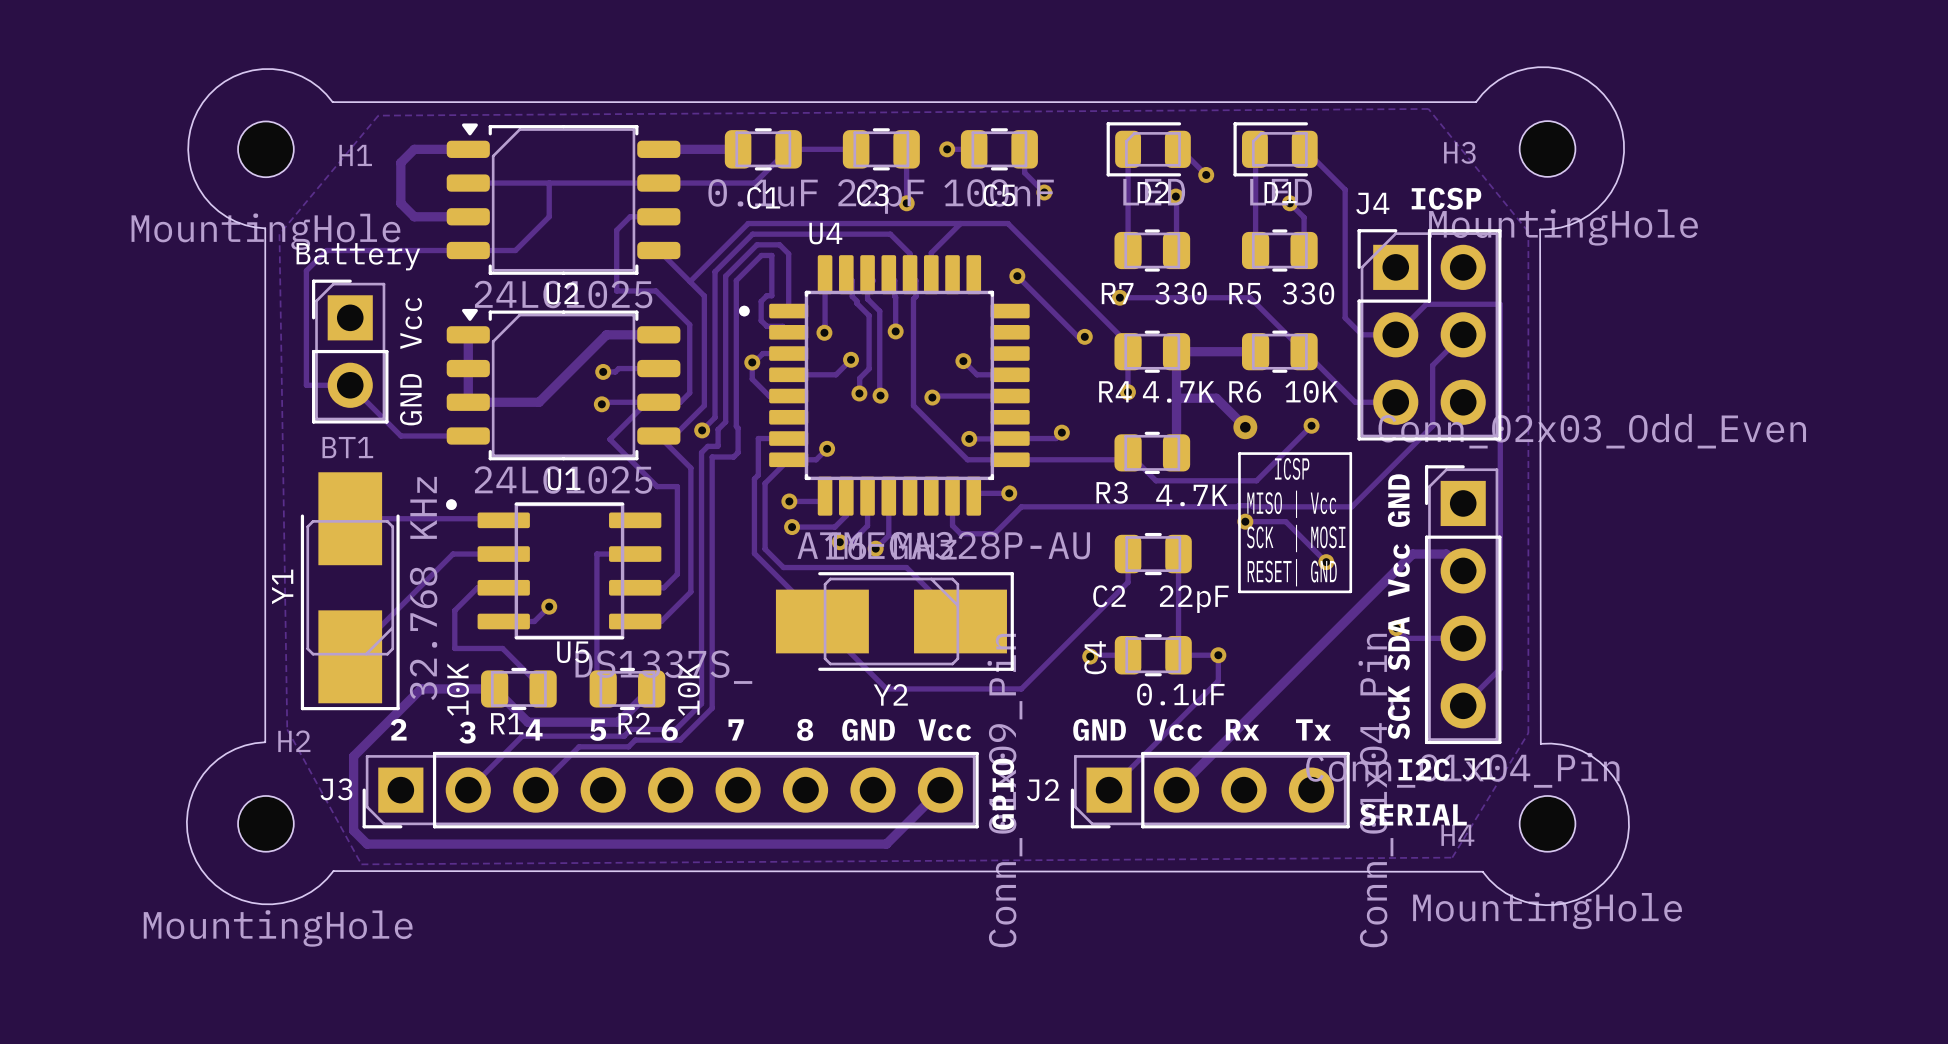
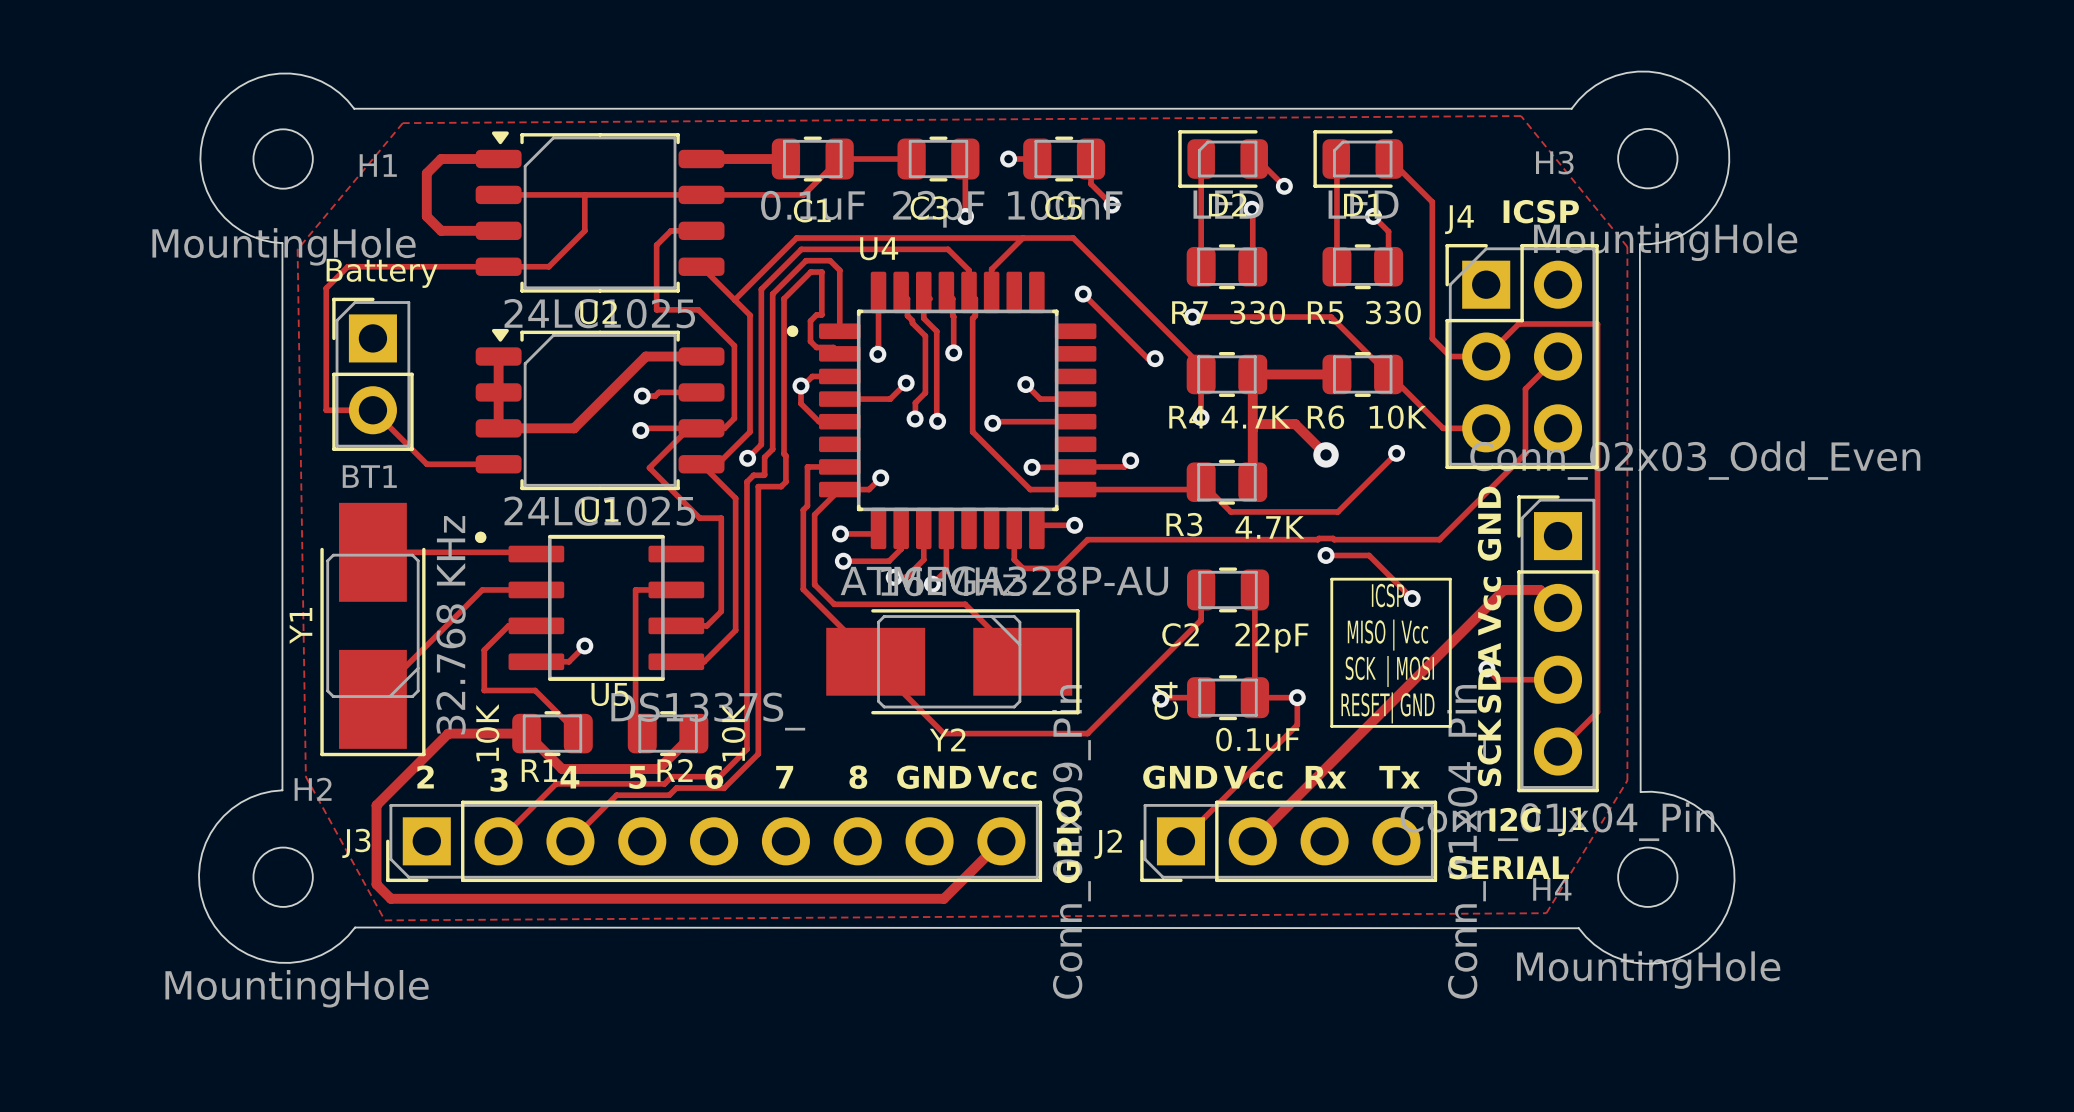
text: Vcc (411, 323) -> none
text: GND (410, 399) -> none
text position: ICSP (1292, 468) -> ICSP (1388, 595)
text position: MISO | Vcc (1291, 504) -> MISO | Vcc (1387, 635)
text position: SCK | MOSI (1296, 538) -> SCK | MOSI (1389, 671)
text position: RESET| GND (1292, 572) -> RESET| GND (1387, 707)
line: (1350, 591) (1239, 591) (1239, 453) (1350, 453) (1350, 591) -> (1449, 726) (1331, 726) (1331, 579) (1450, 579) (1450, 726)

